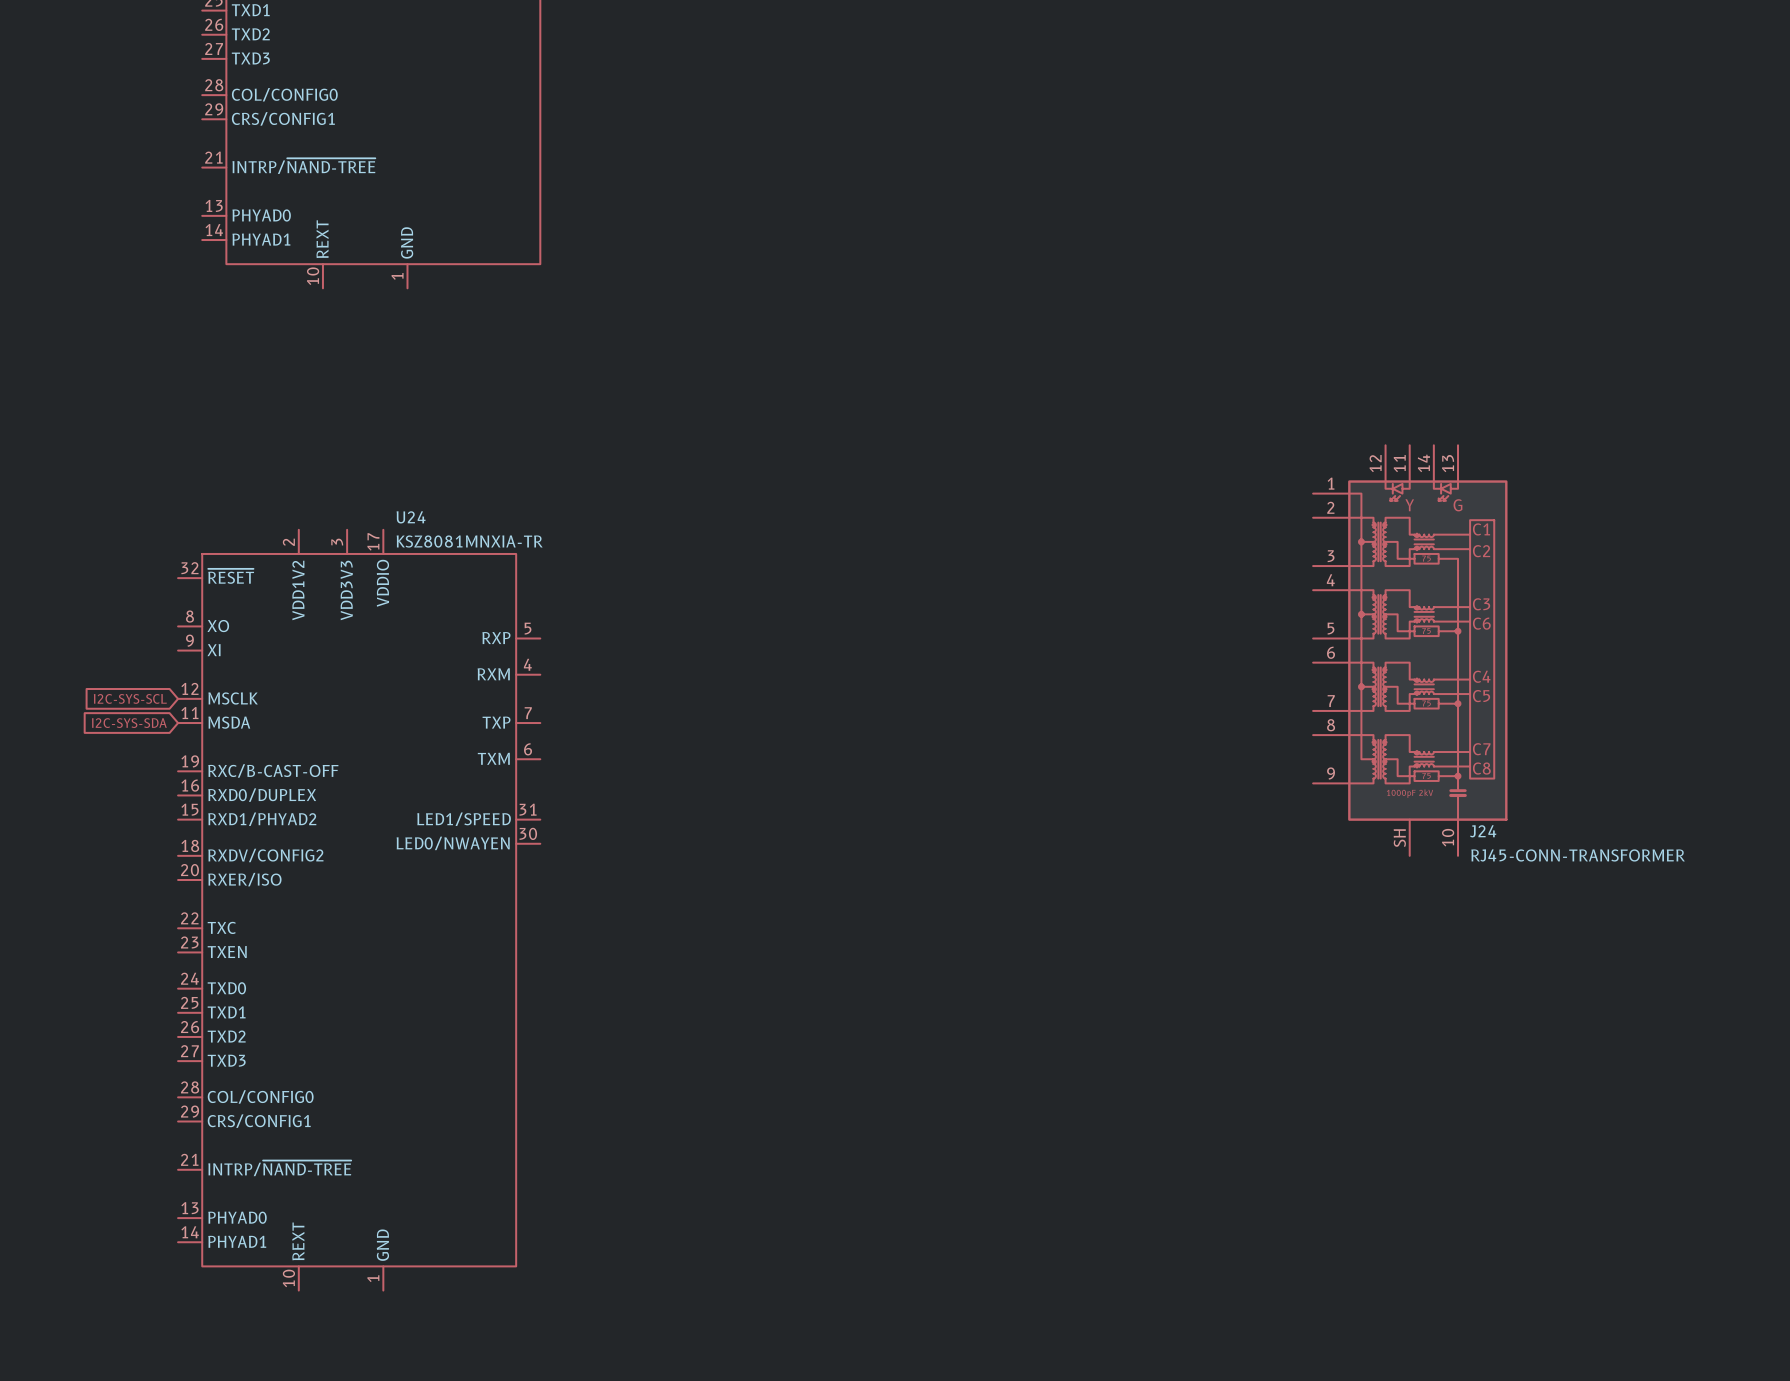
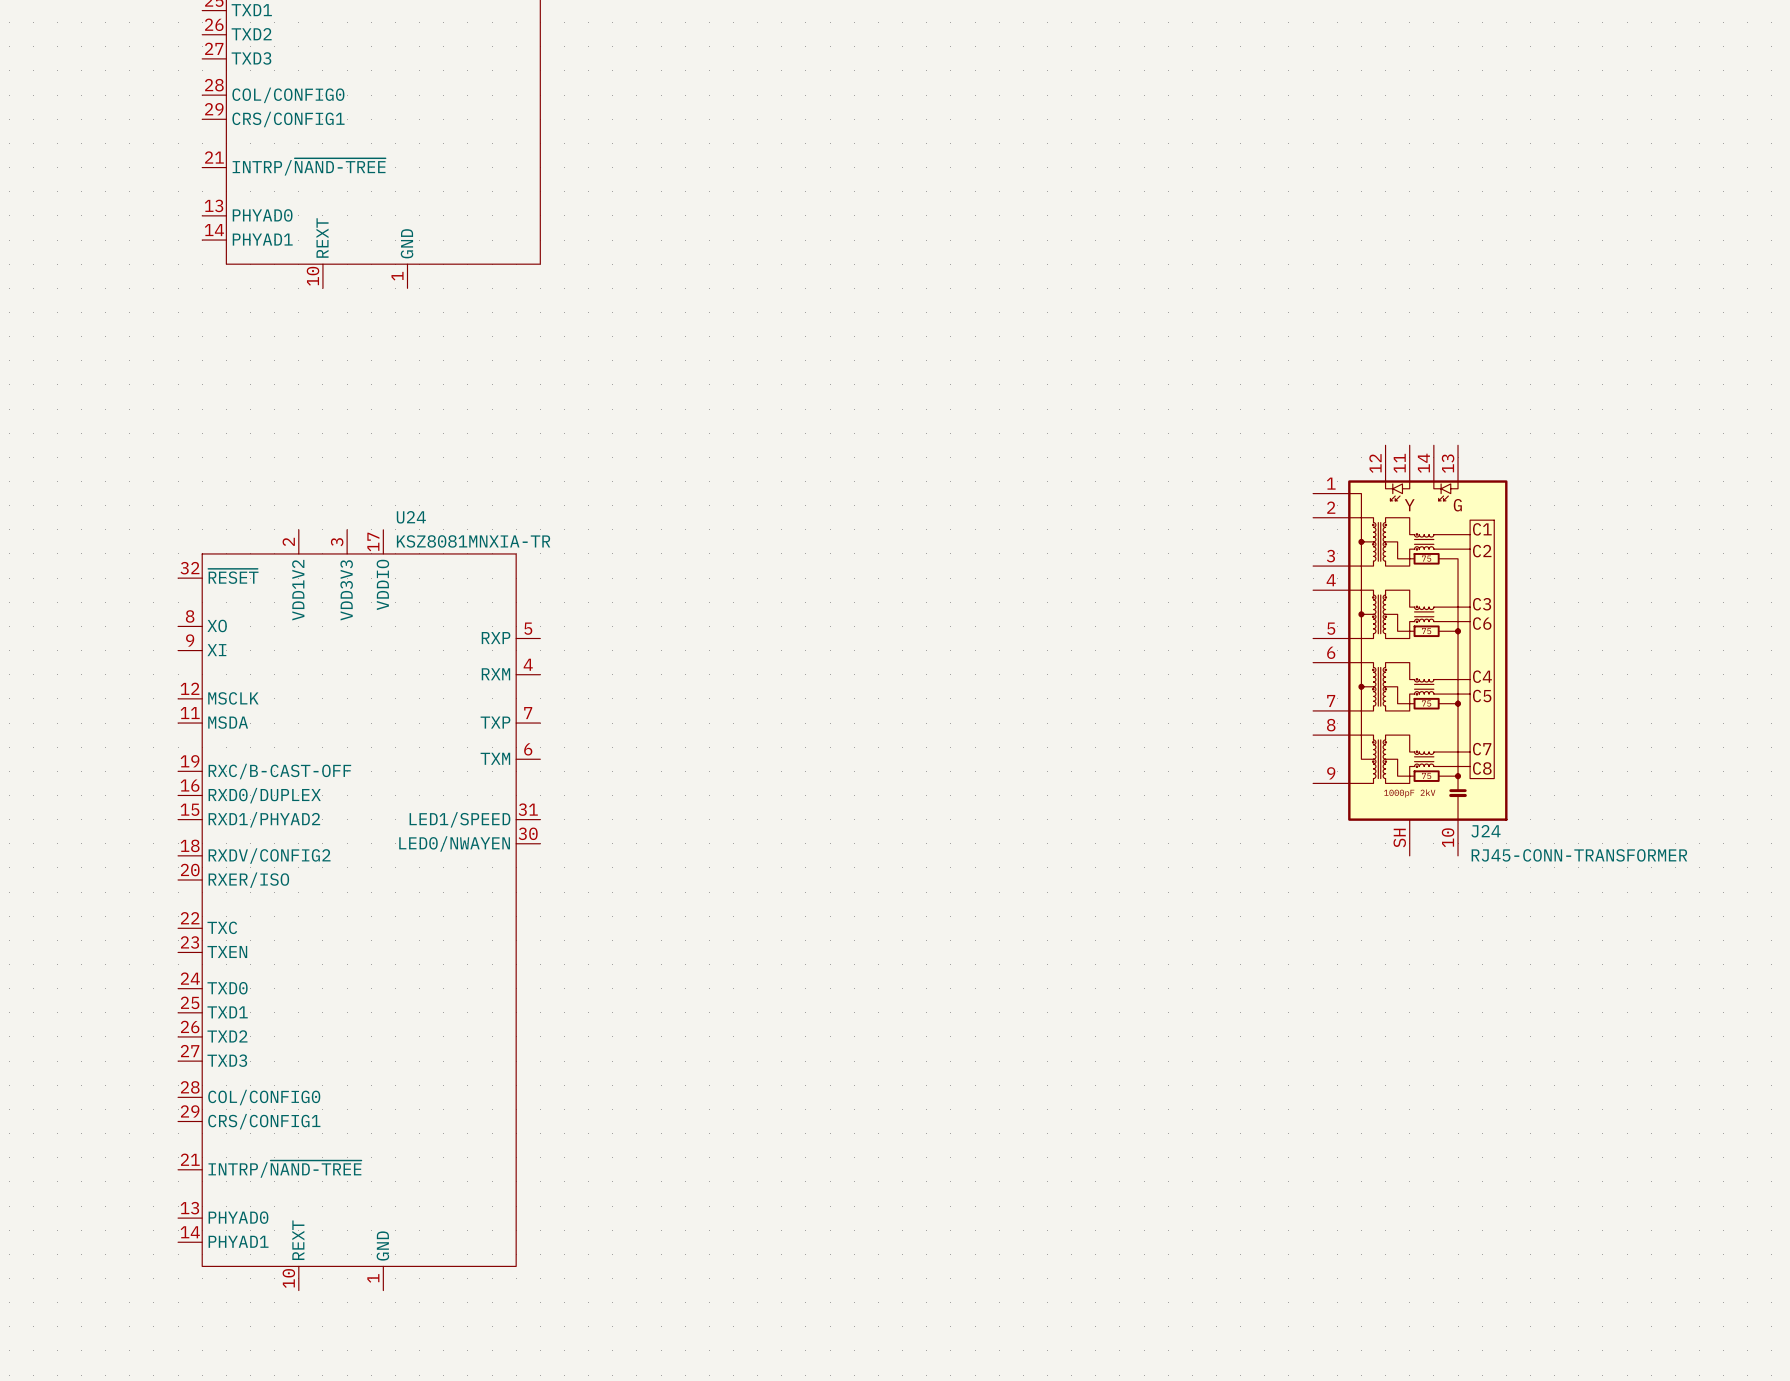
global label: I2C-SYS-SCL (130, 698) -> none
global label: I2C-SYS-SDA (129, 723) -> none

